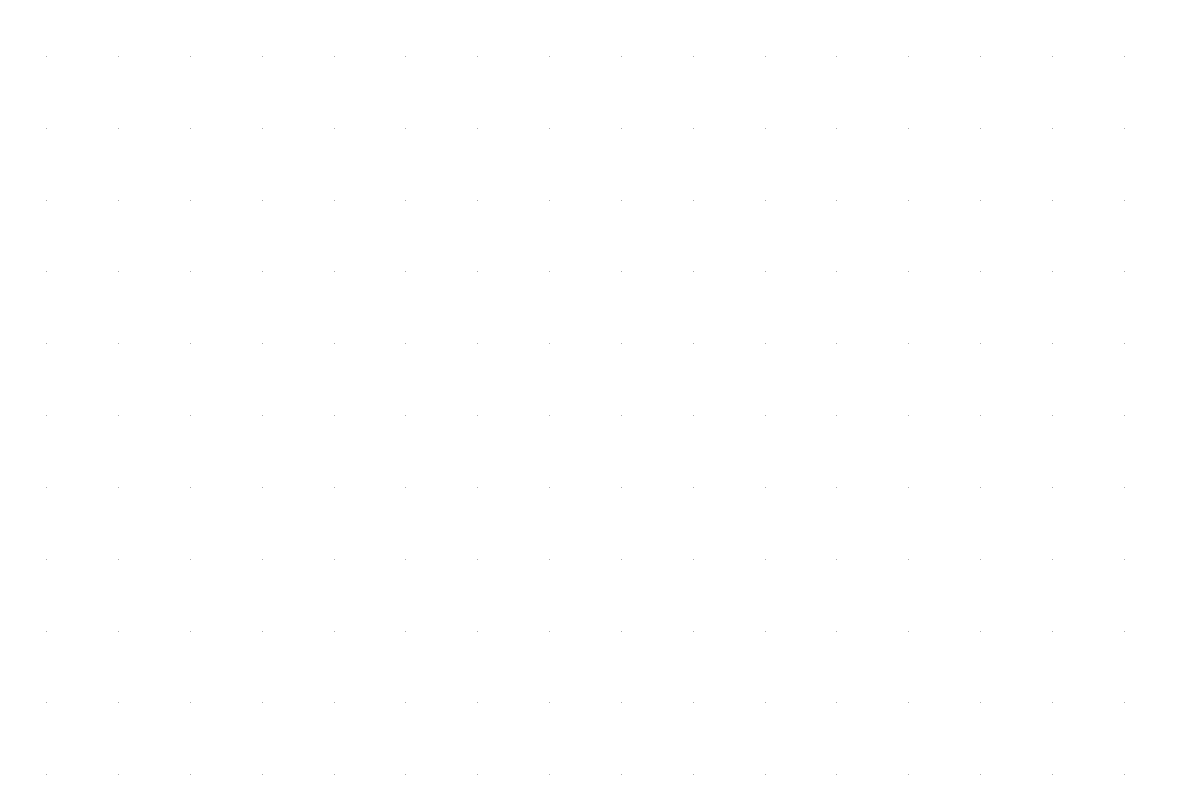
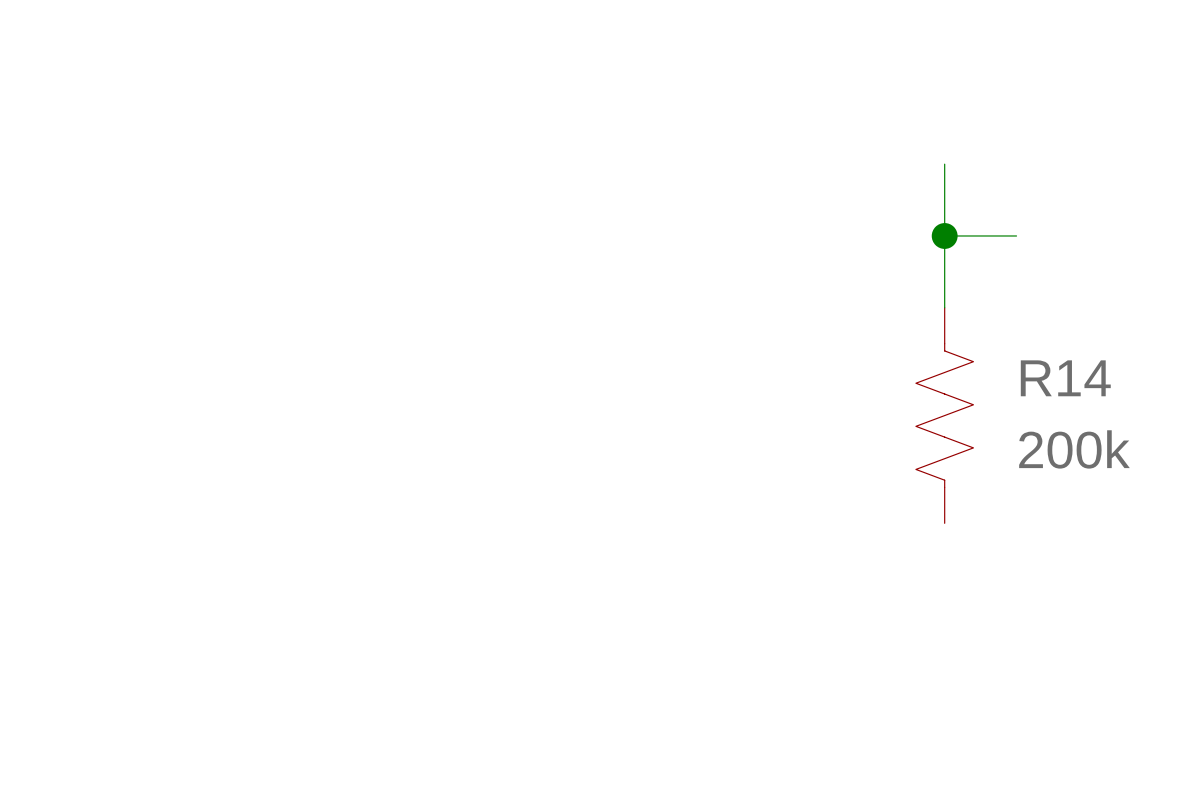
wire: none -> (944, 164) (944, 307)
wire: none -> (944, 235) (1016, 235)
junction: none -> (944, 235)
R14: none -> 200k (944, 415)

